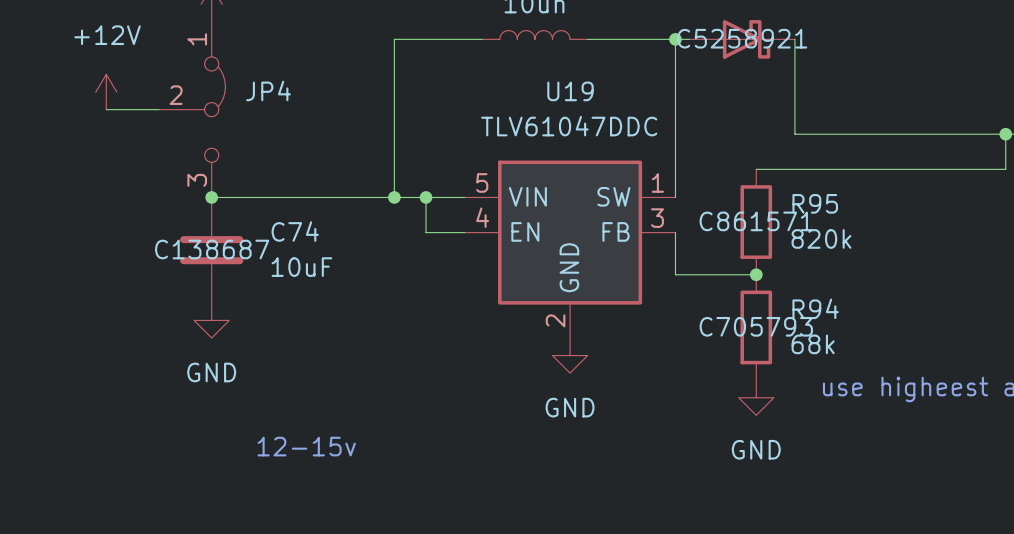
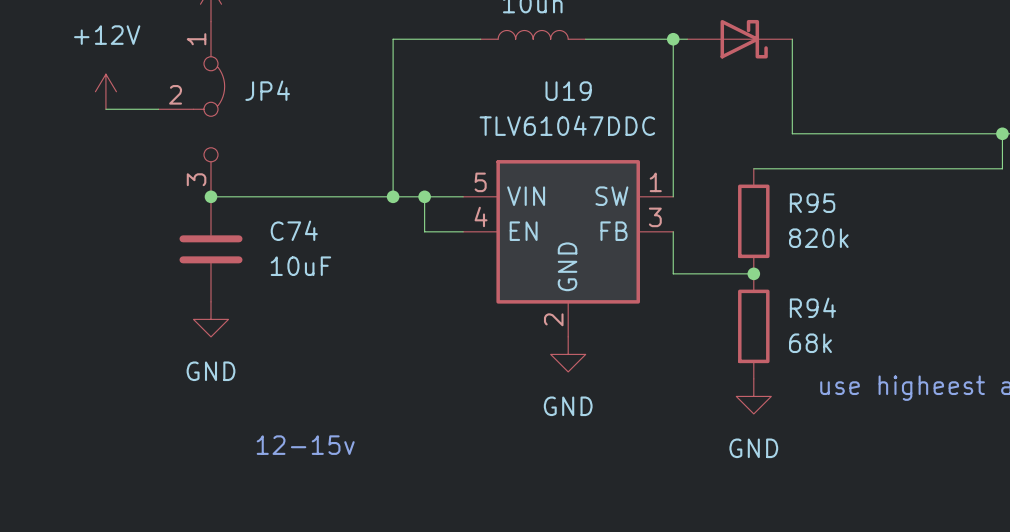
part text: C5258921 (742, 38) -> none
R95 text: C861571 (756, 221) -> none
C74 text: C138687 (212, 249) -> none
R94 text: C705793 (756, 326) -> none

